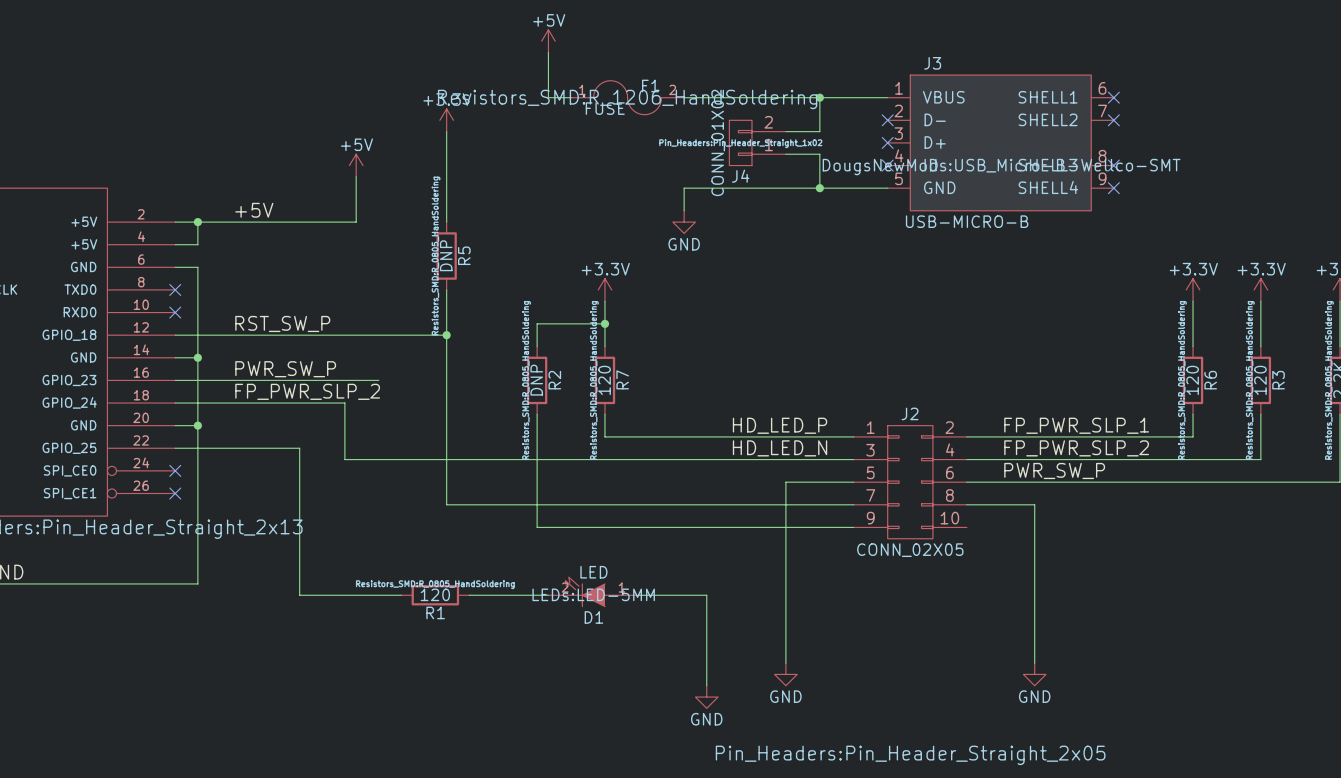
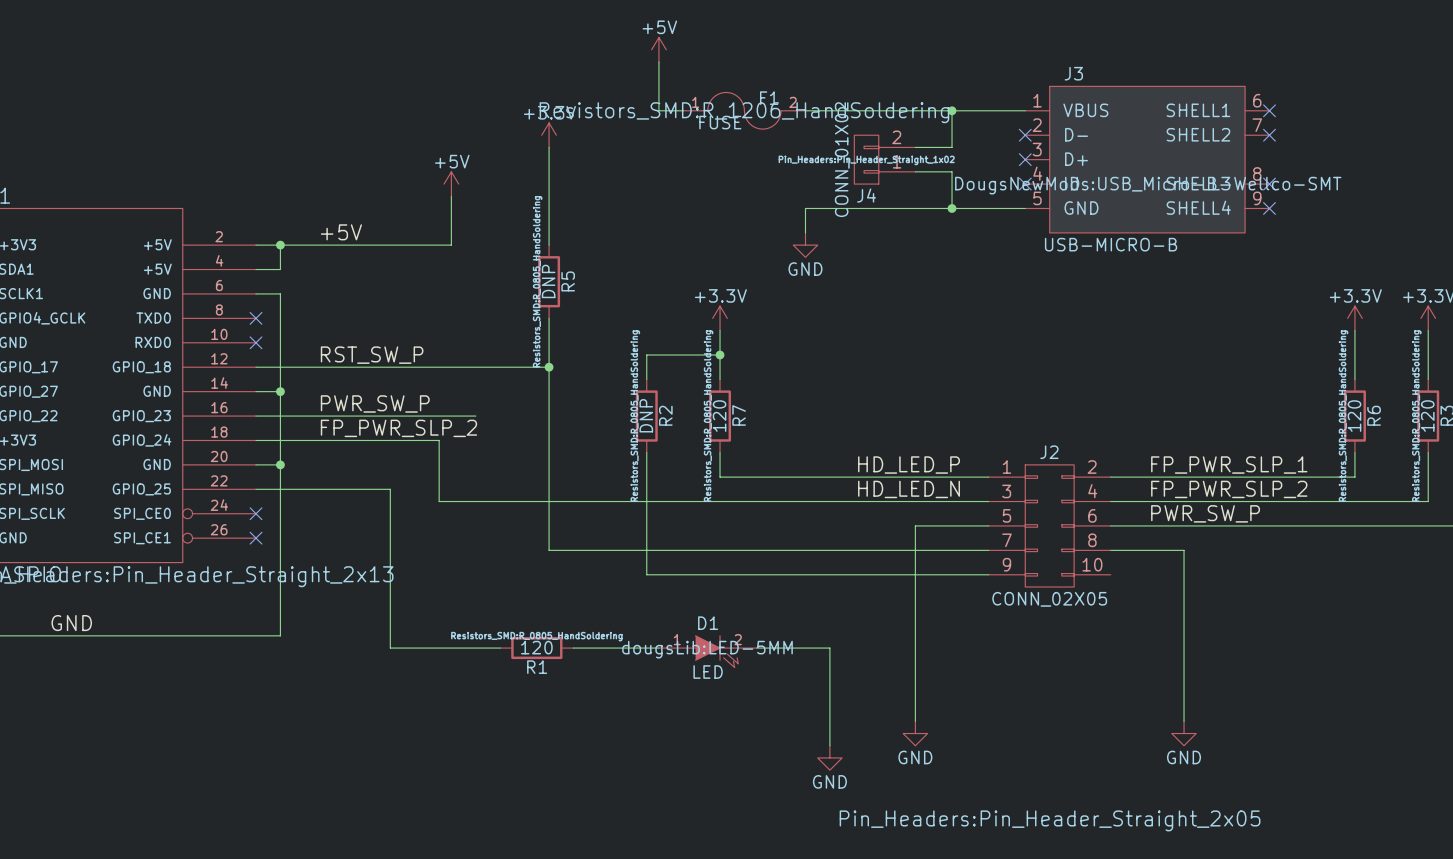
D1 rotation: 0° (585, 591) -> 180° (716, 651)
D1 text: LEDs:LED-5MM (593, 594) -> dougsLib:LED-5MM (707, 649)

